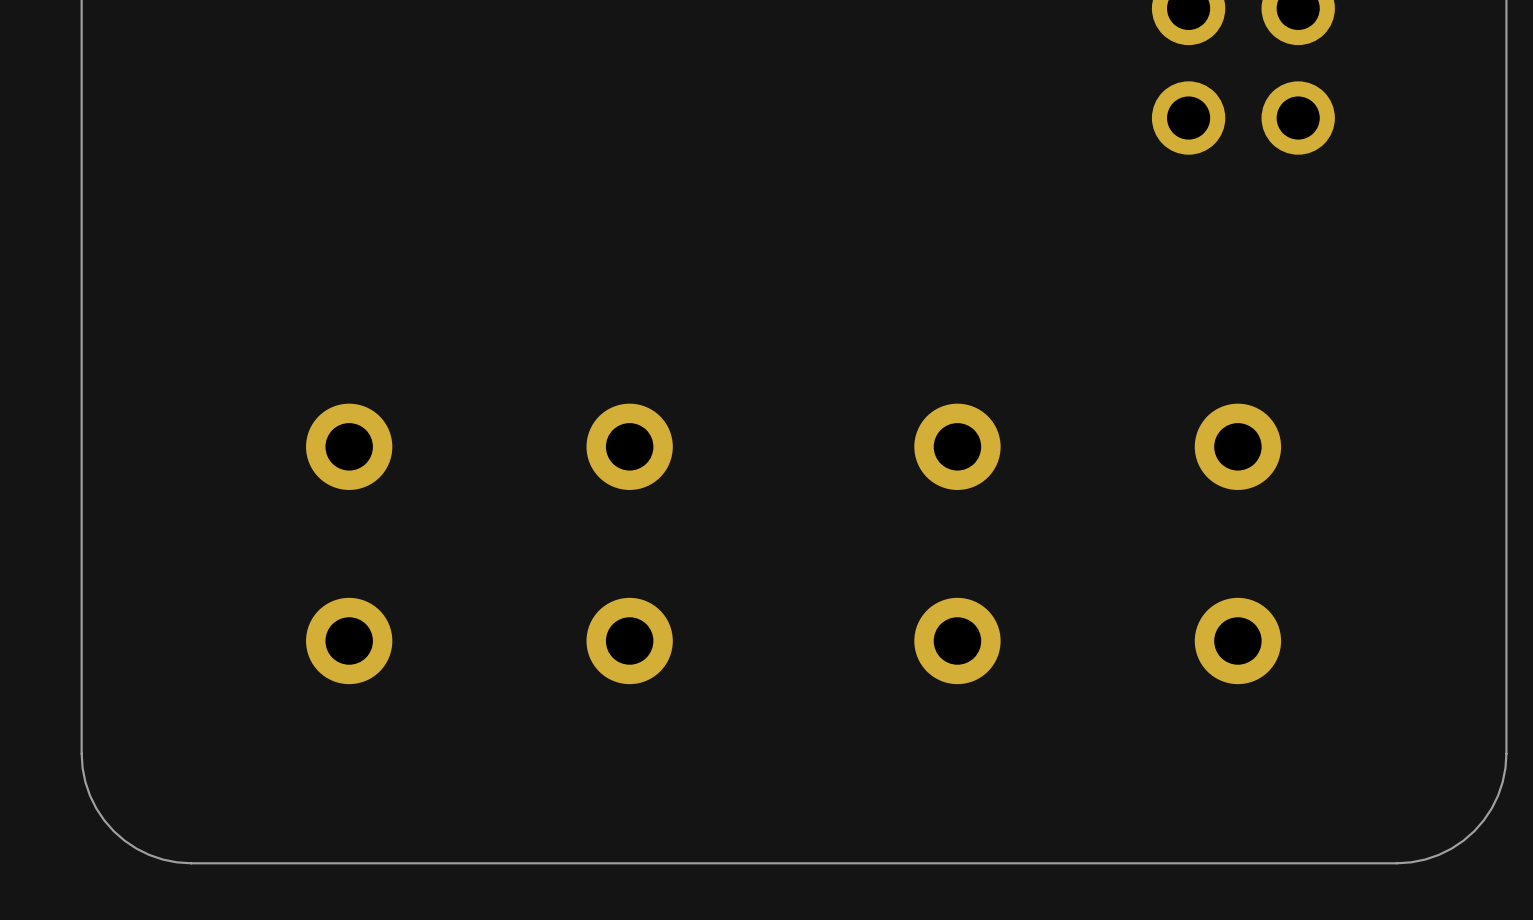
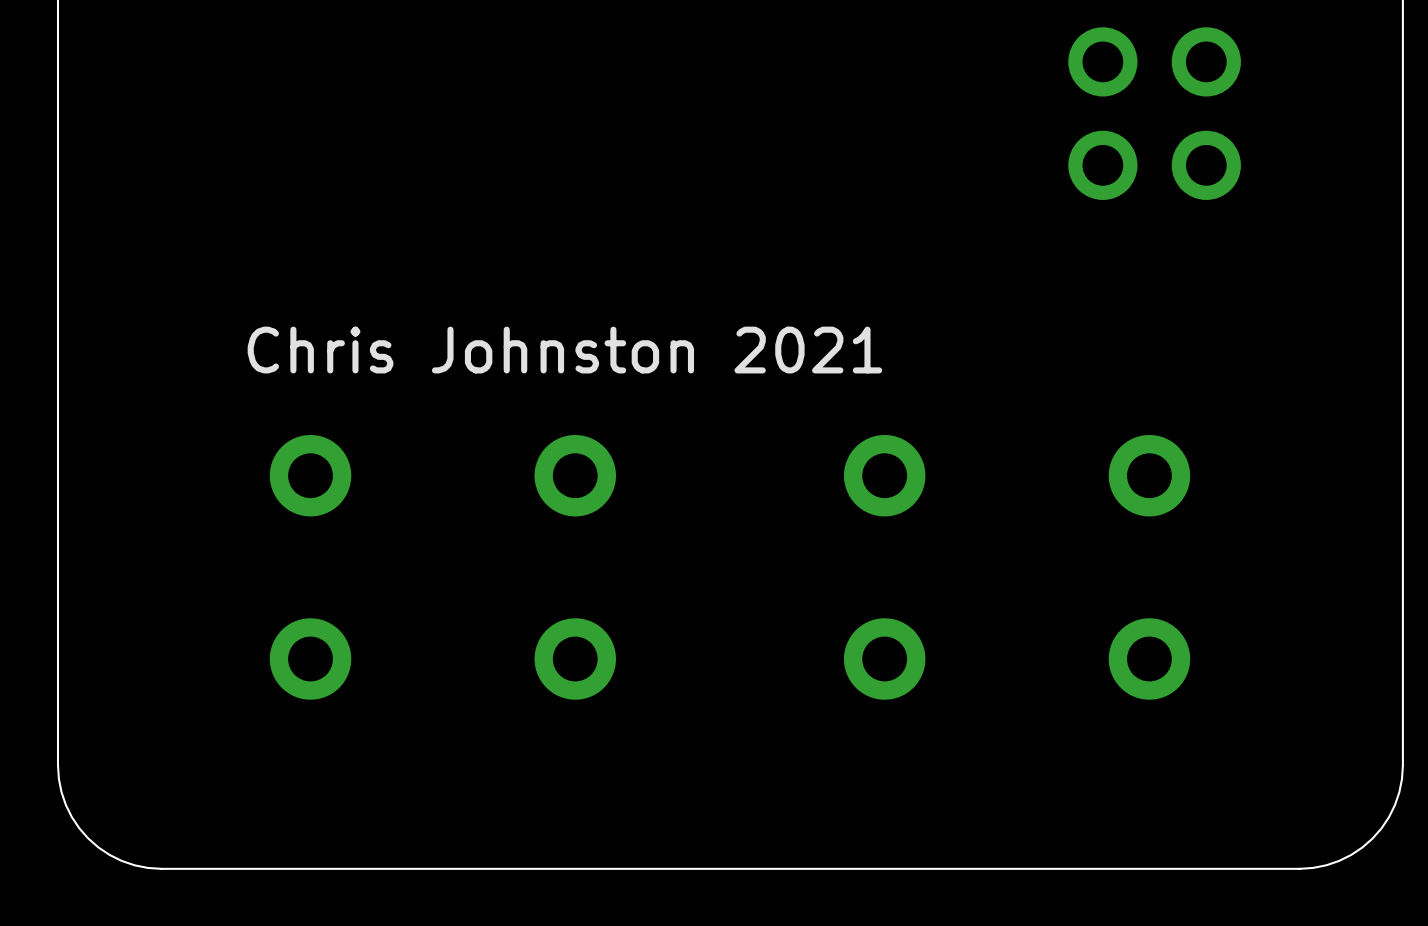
text: none -> Chris Johnston 2021 (564, 350)

